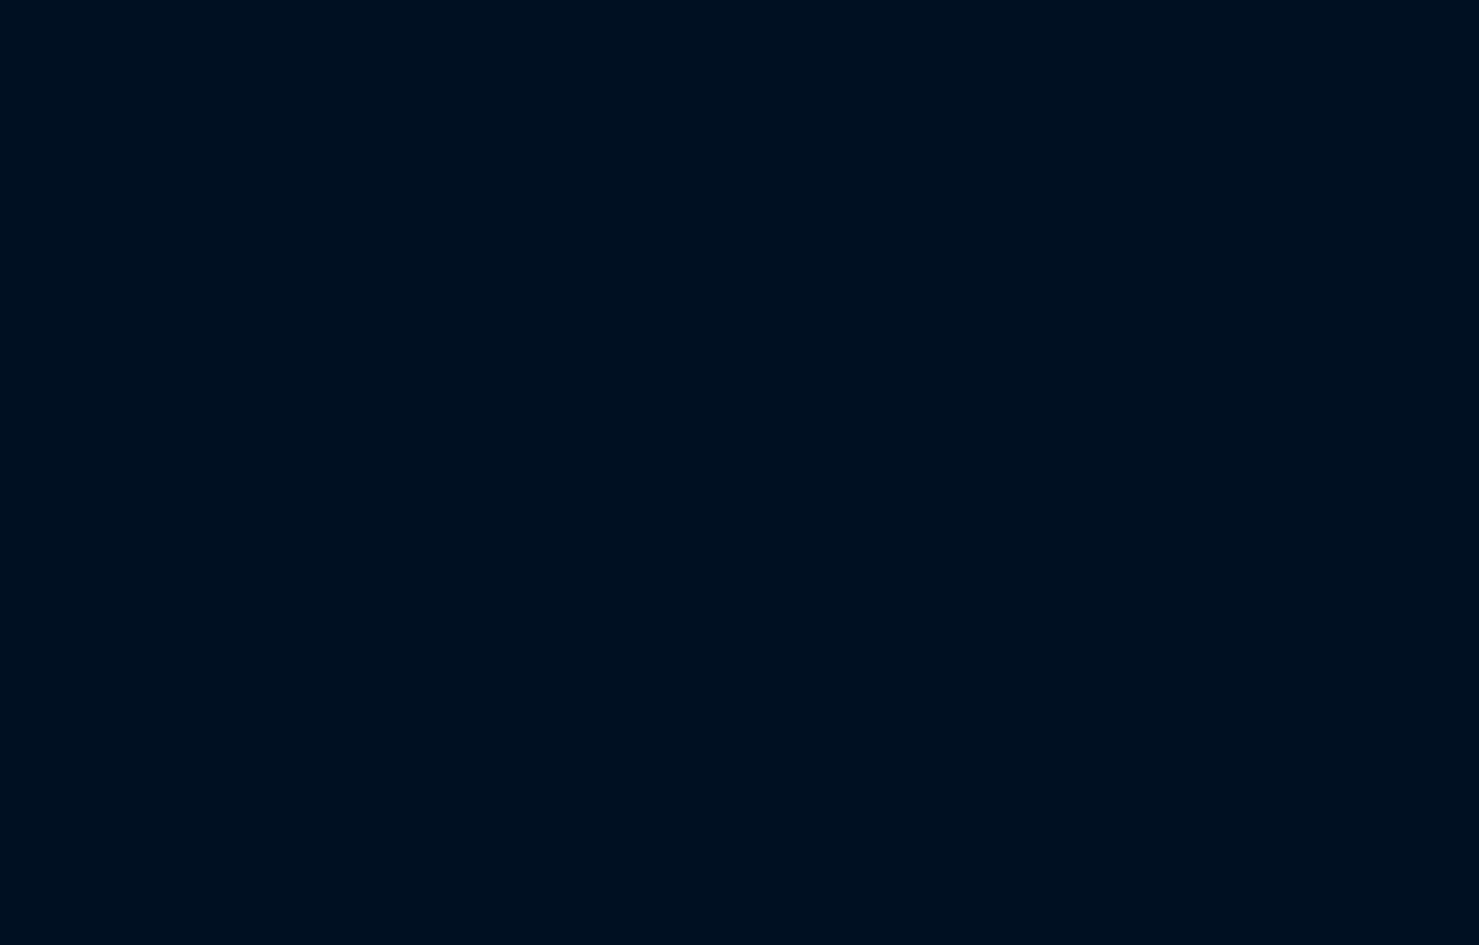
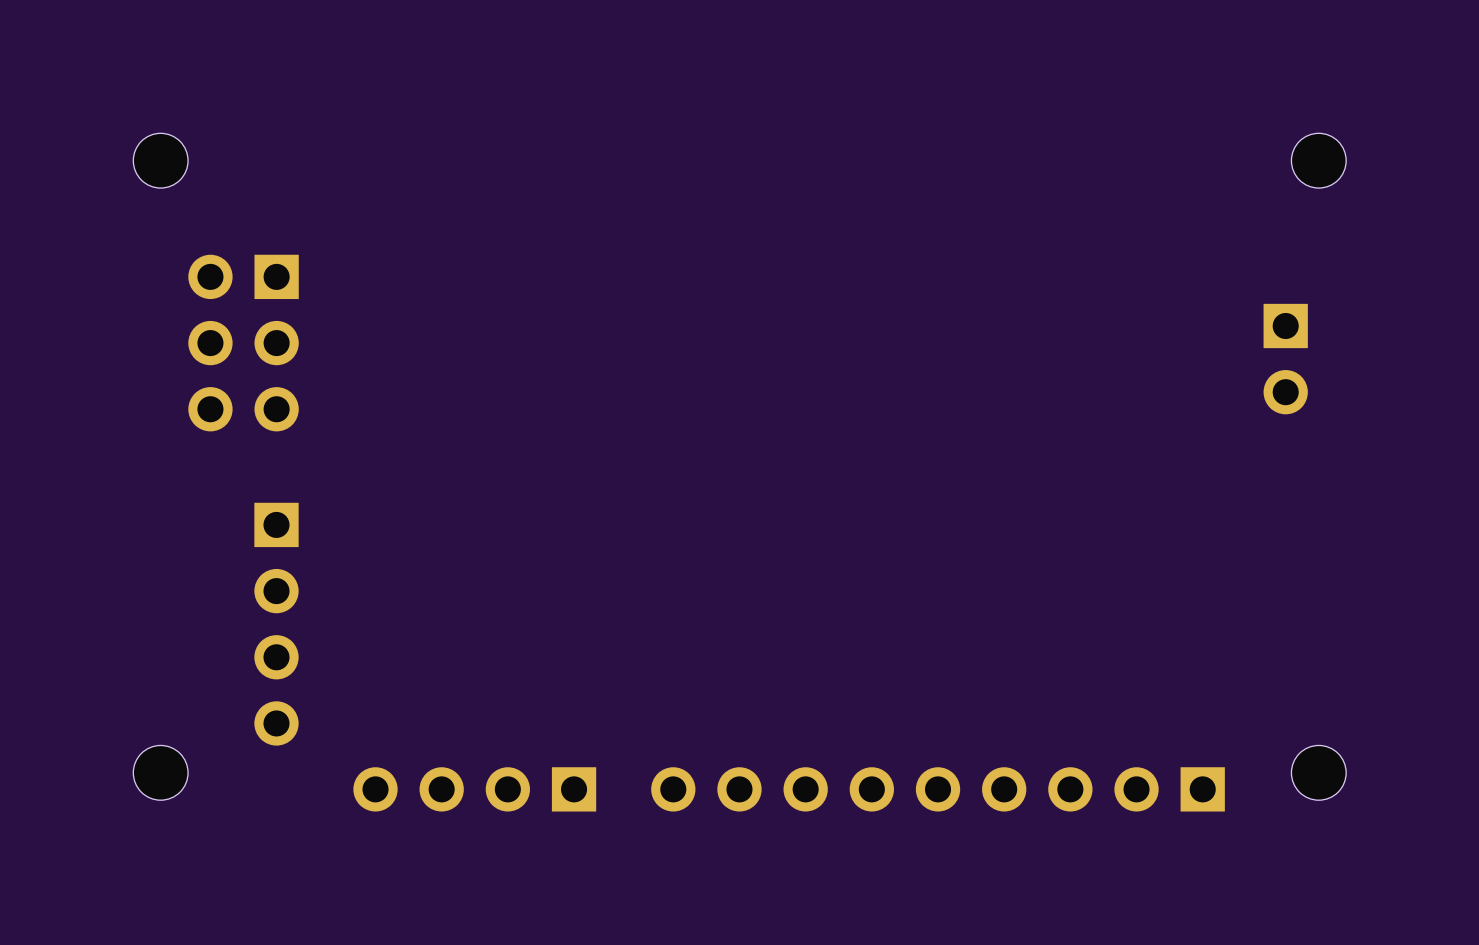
part: none -> (160, 160)
part: none -> (1318, 160)
part: none -> (243, 343)
part: none -> (1285, 359)
part: none -> (276, 624)
part: none -> (160, 772)
part: none -> (1318, 772)
part: none -> (474, 789)
part: none -> (938, 789)

